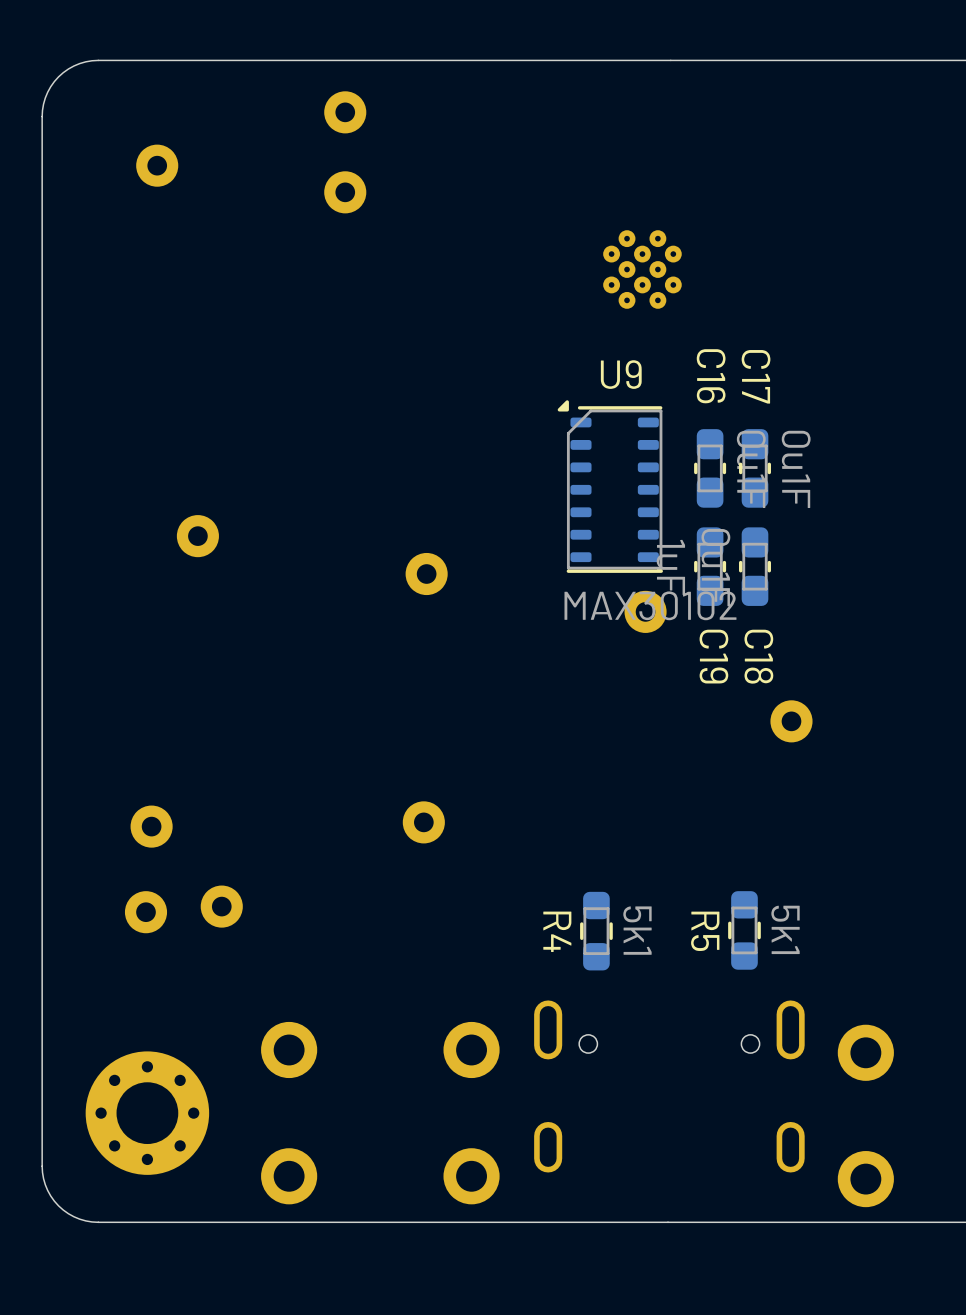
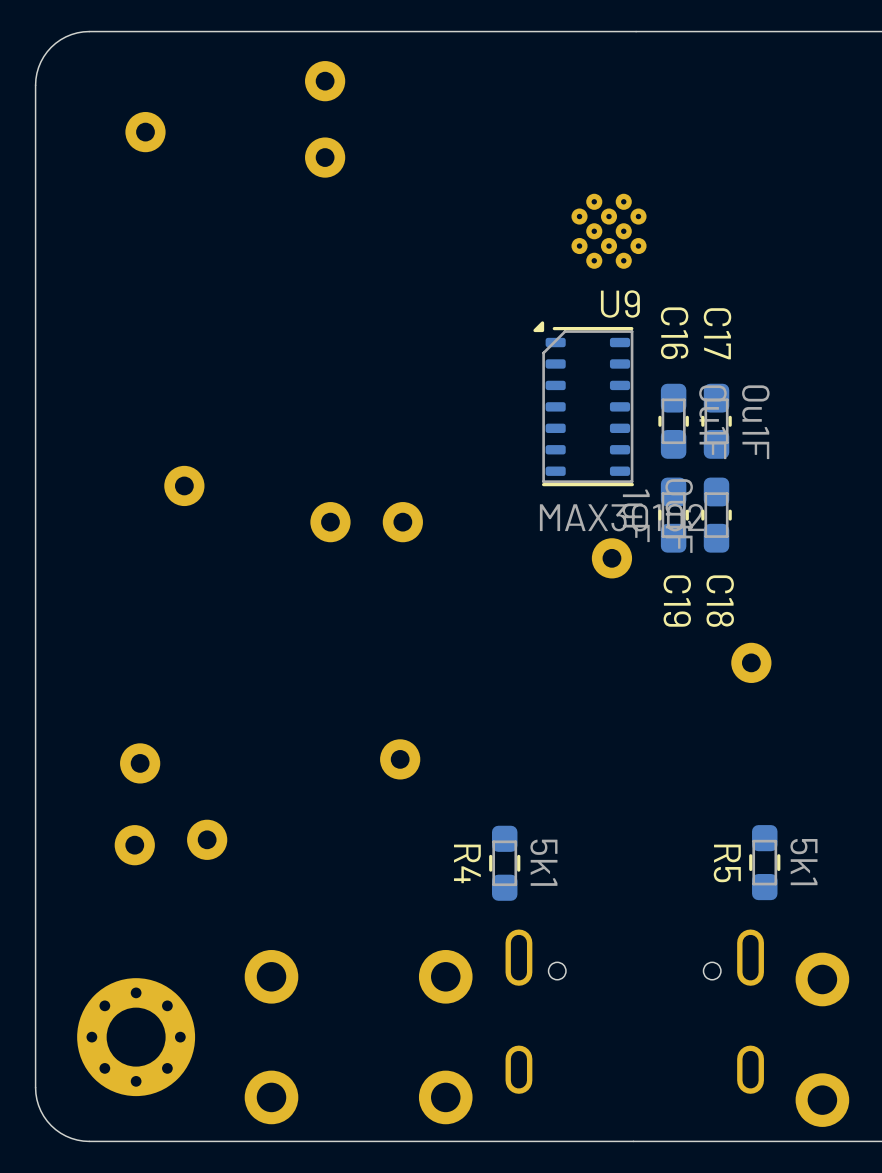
U9 name position: U9 (621, 374) -> U9 (620, 304)
U9 position: (610, 486) -> (583, 403)
part: none -> (330, 522)
R5 position: (744, 930) -> (764, 862)
R4 position: (596, 931) -> (504, 863)

